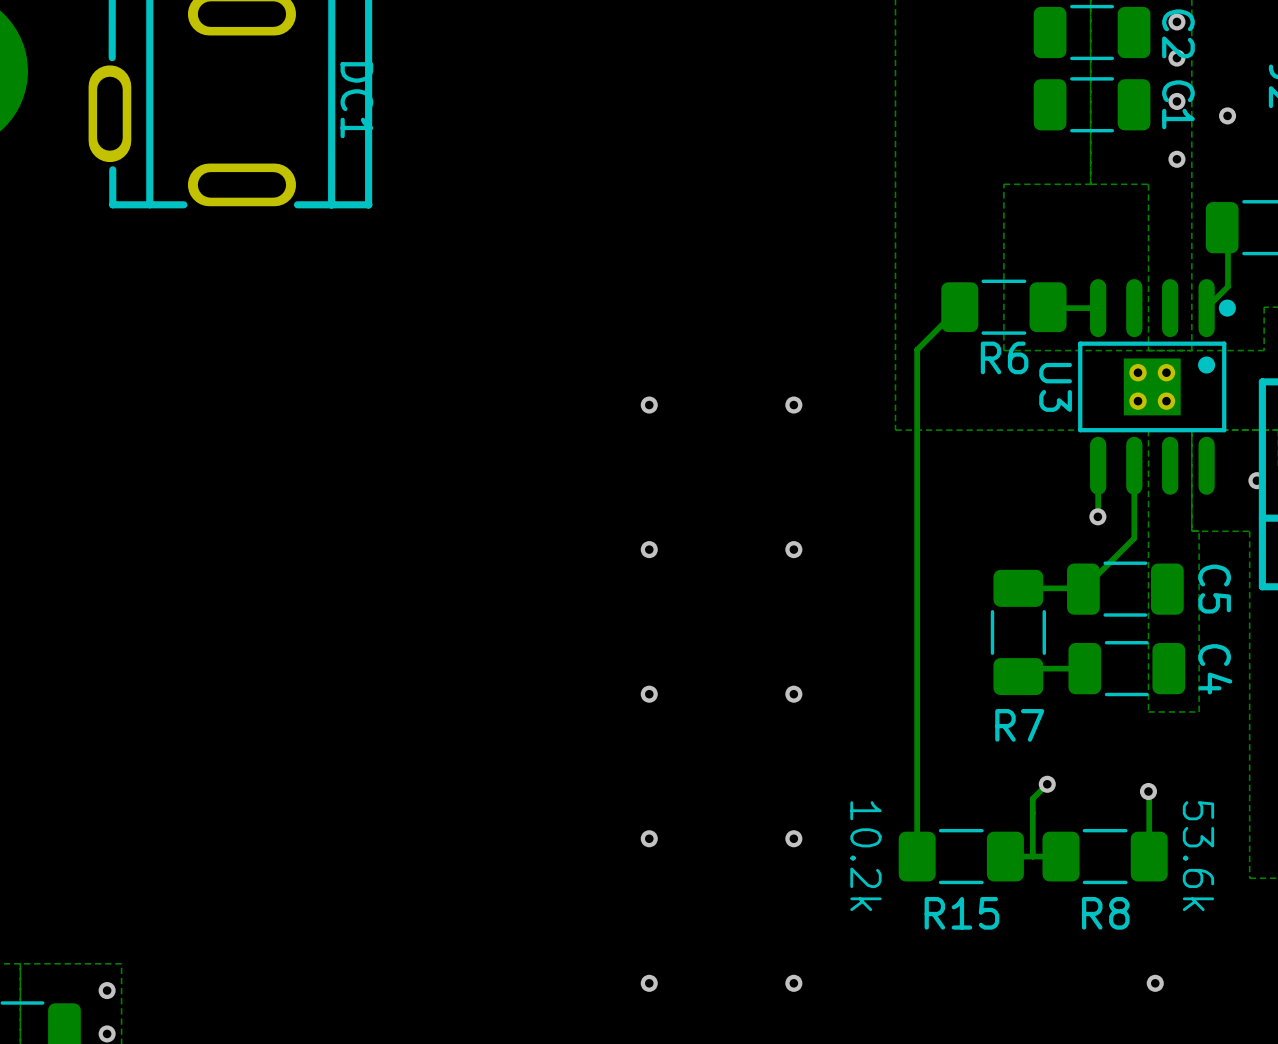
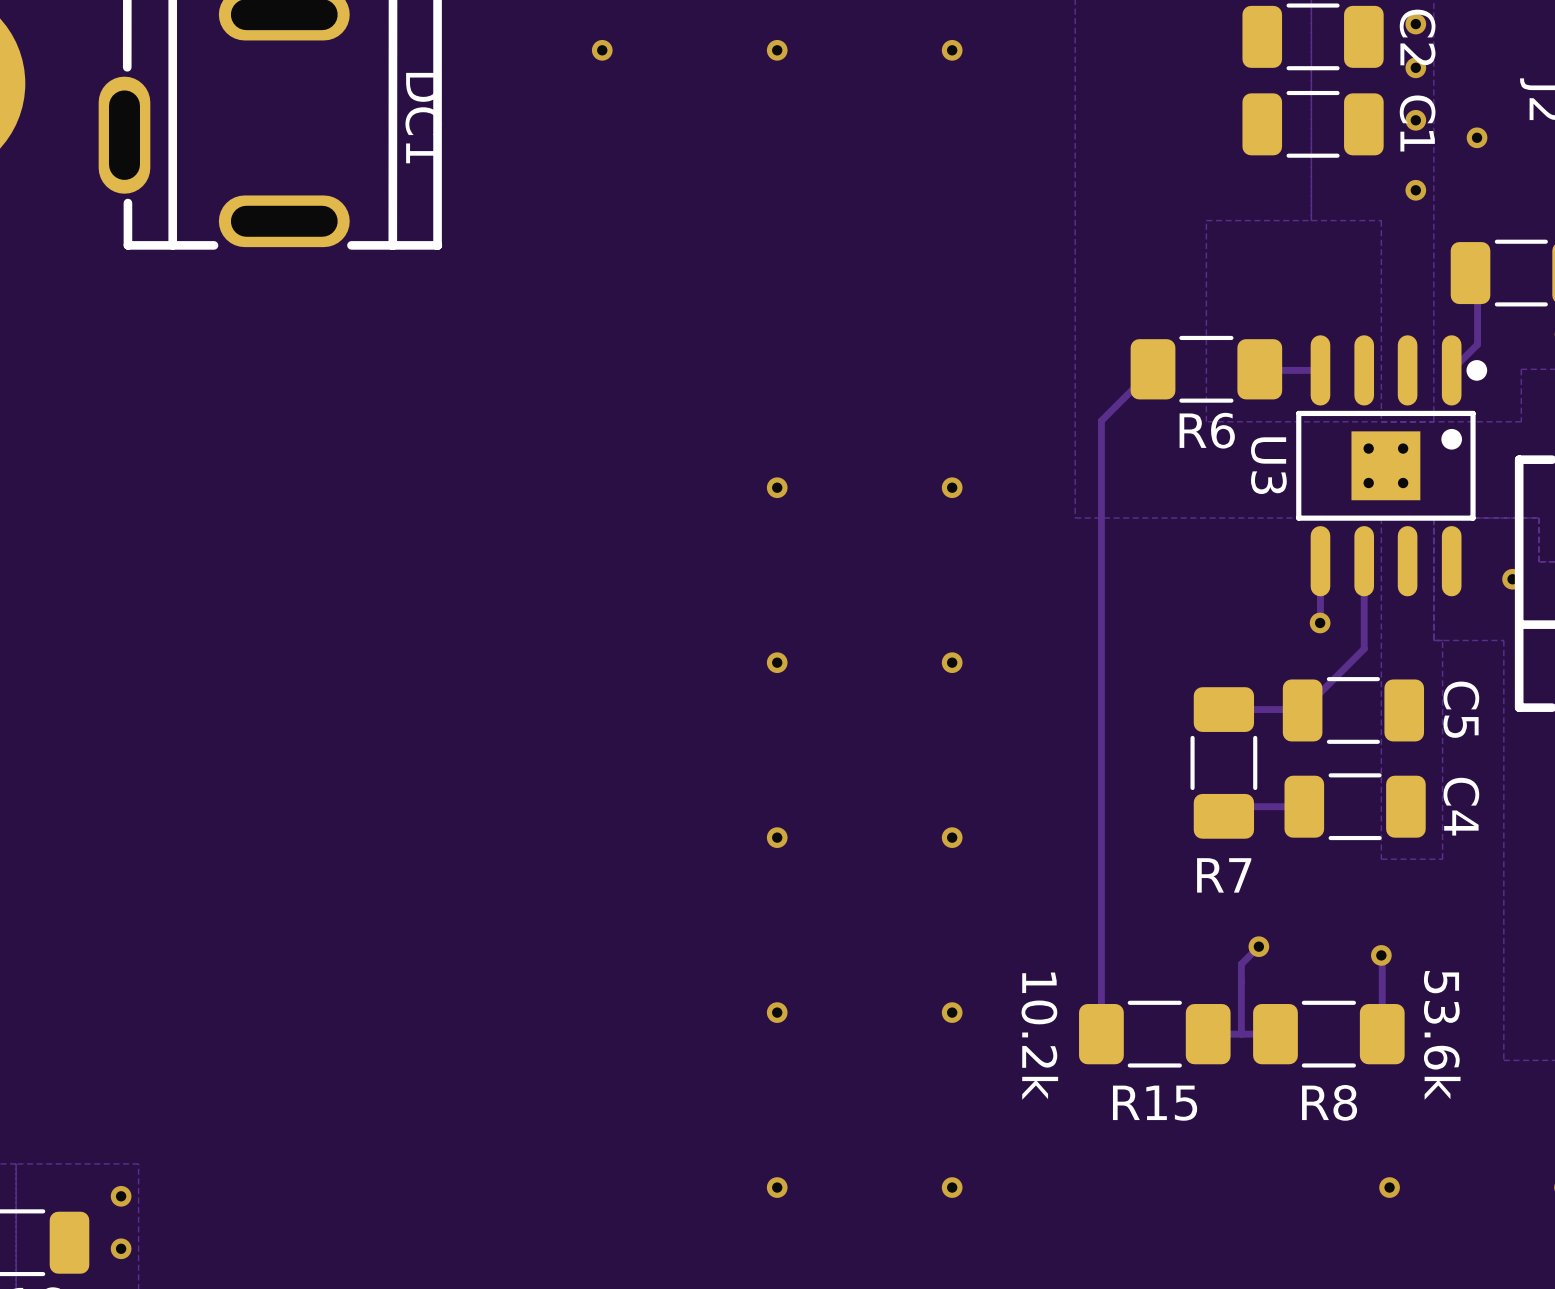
via: none -> (602, 50)
via: none -> (777, 50)
via: none -> (952, 50)

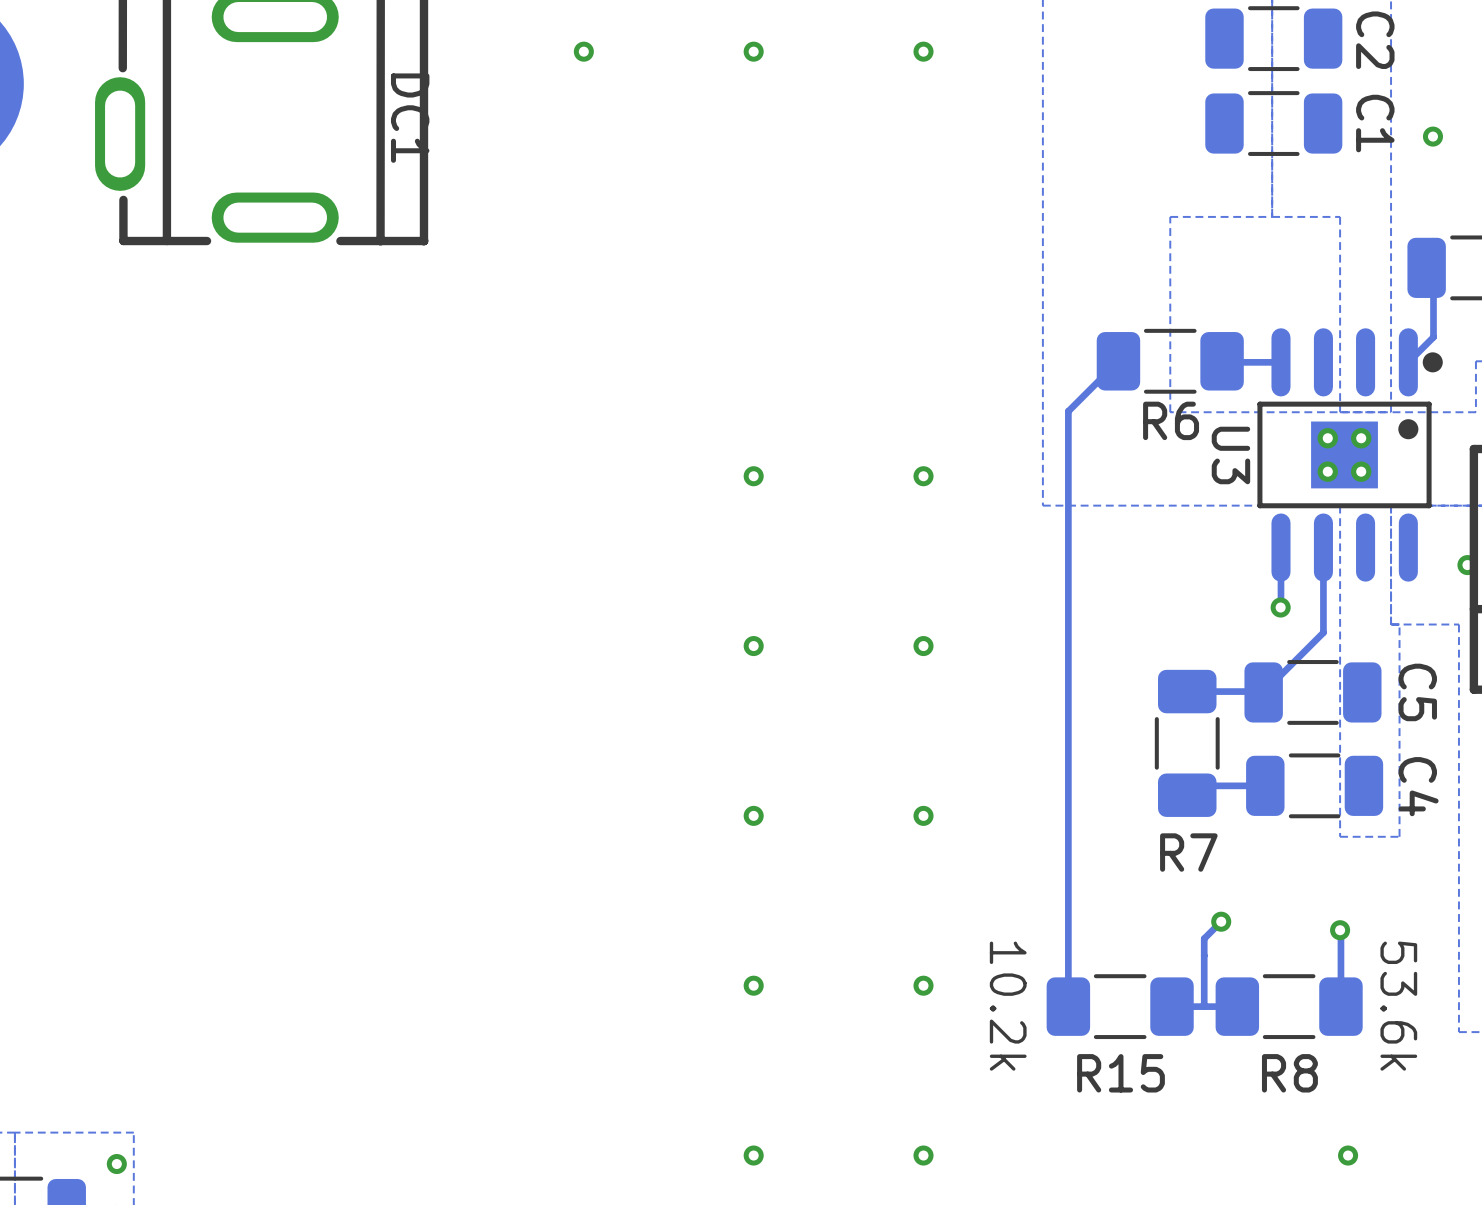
via: (1415, 24) -> none
via: (1415, 67) -> none
via: (1415, 120) -> none
via: (1415, 190) -> none

